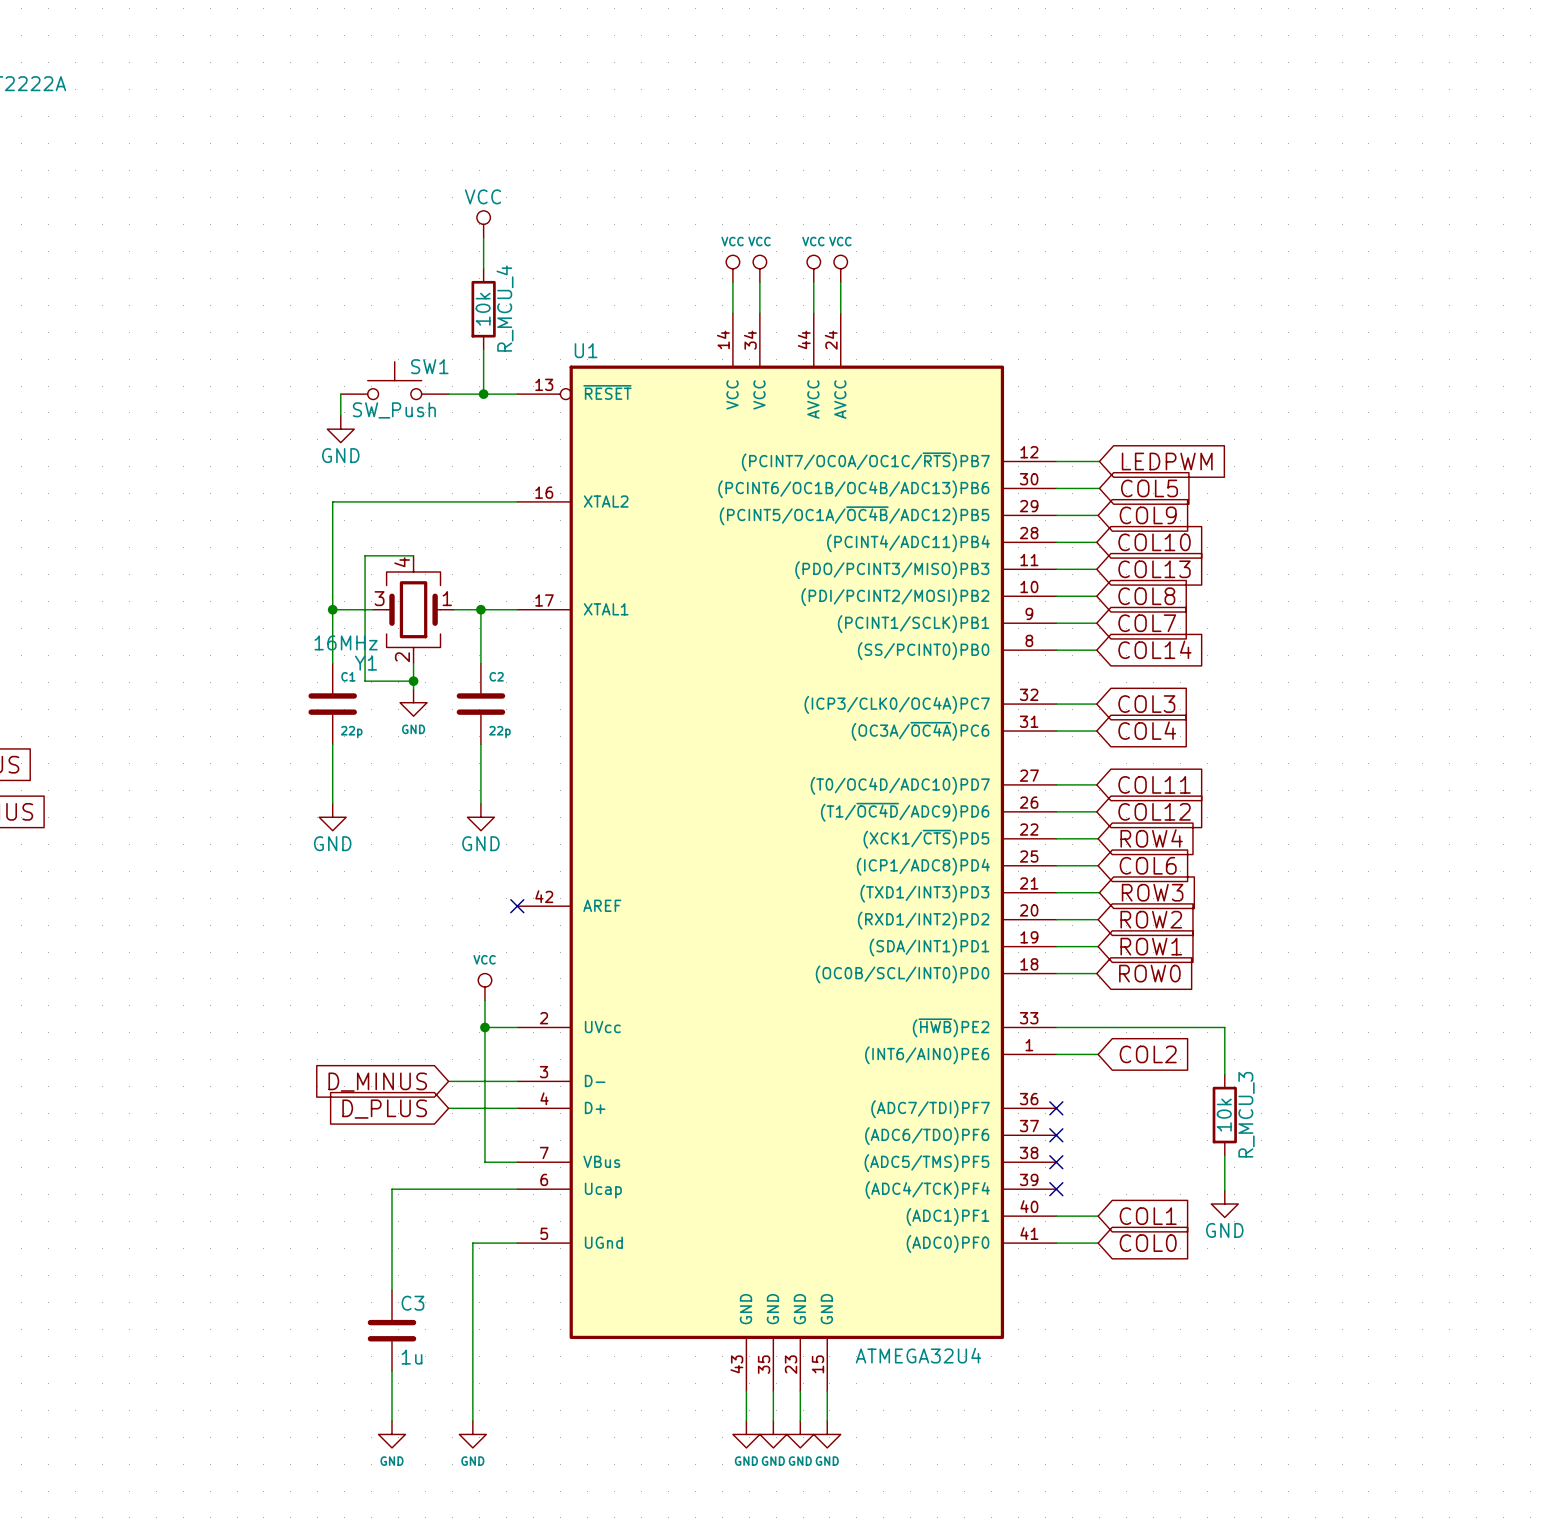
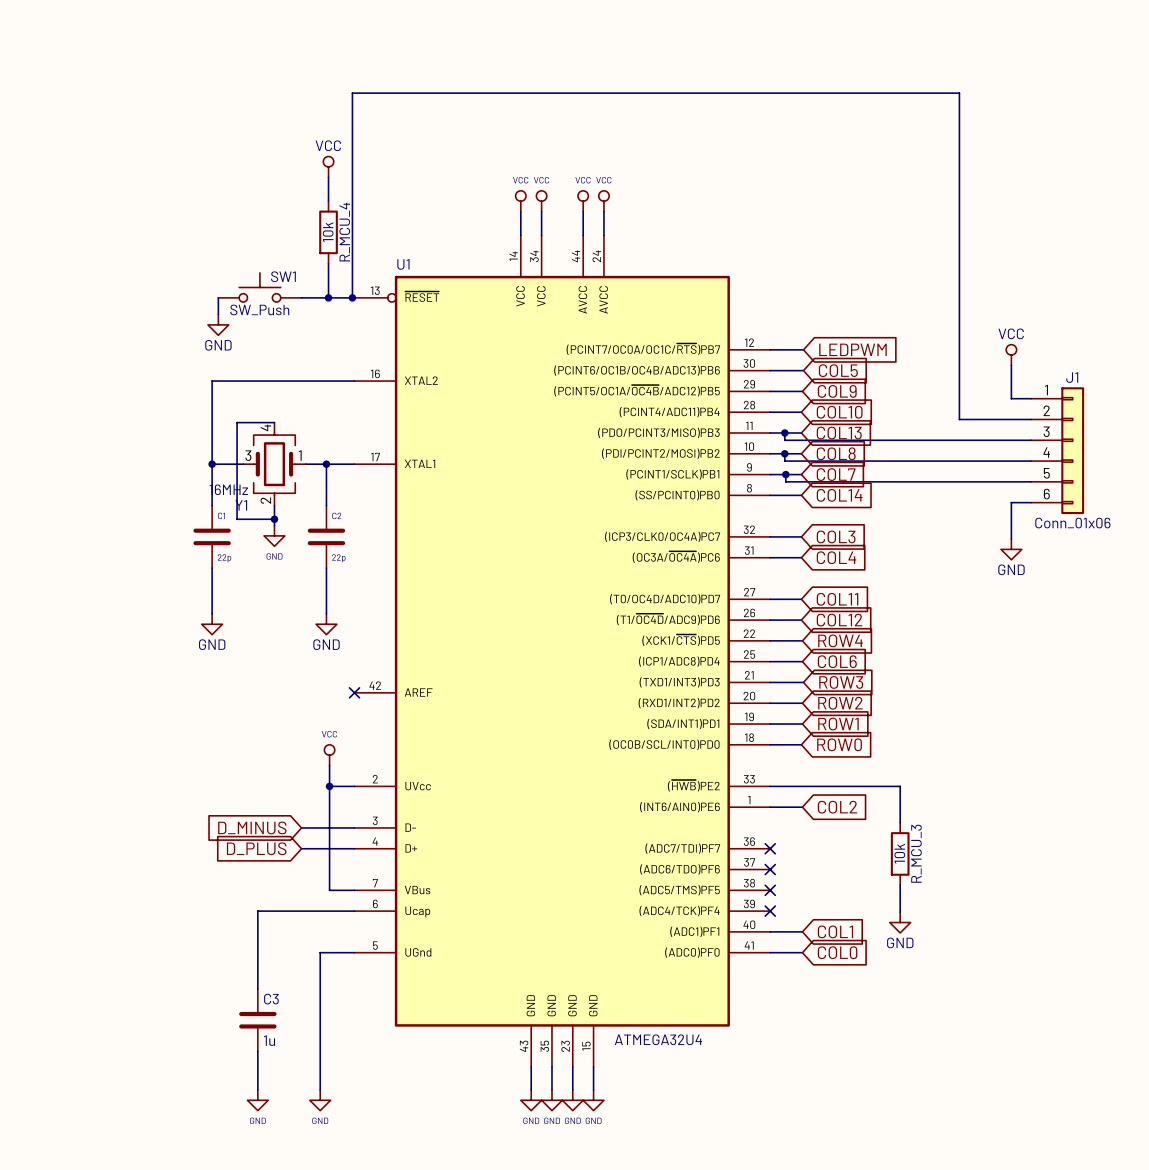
wire: none -> (352, 297) (352, 93) (959, 93) (959, 419) (1031, 419)
junction: none -> (352, 297)
power symbol: none -> VCC (1011, 355)
wire: none -> (1011, 365) (1011, 398) (1031, 398)
wire: none -> (784, 433) (784, 440) (1031, 440)
junction: none -> (784, 433)
J1: none -> Conn_01x06 (1057, 450)
wire: none -> (784, 453) (784, 461) (1031, 461)
junction: none -> (784, 453)
wire: none -> (785, 474) (785, 481) (1031, 481)
junction: none -> (785, 474)
wire: none -> (1031, 502) (1011, 502) (1011, 539)
power symbol: none -> GND (1011, 549)

